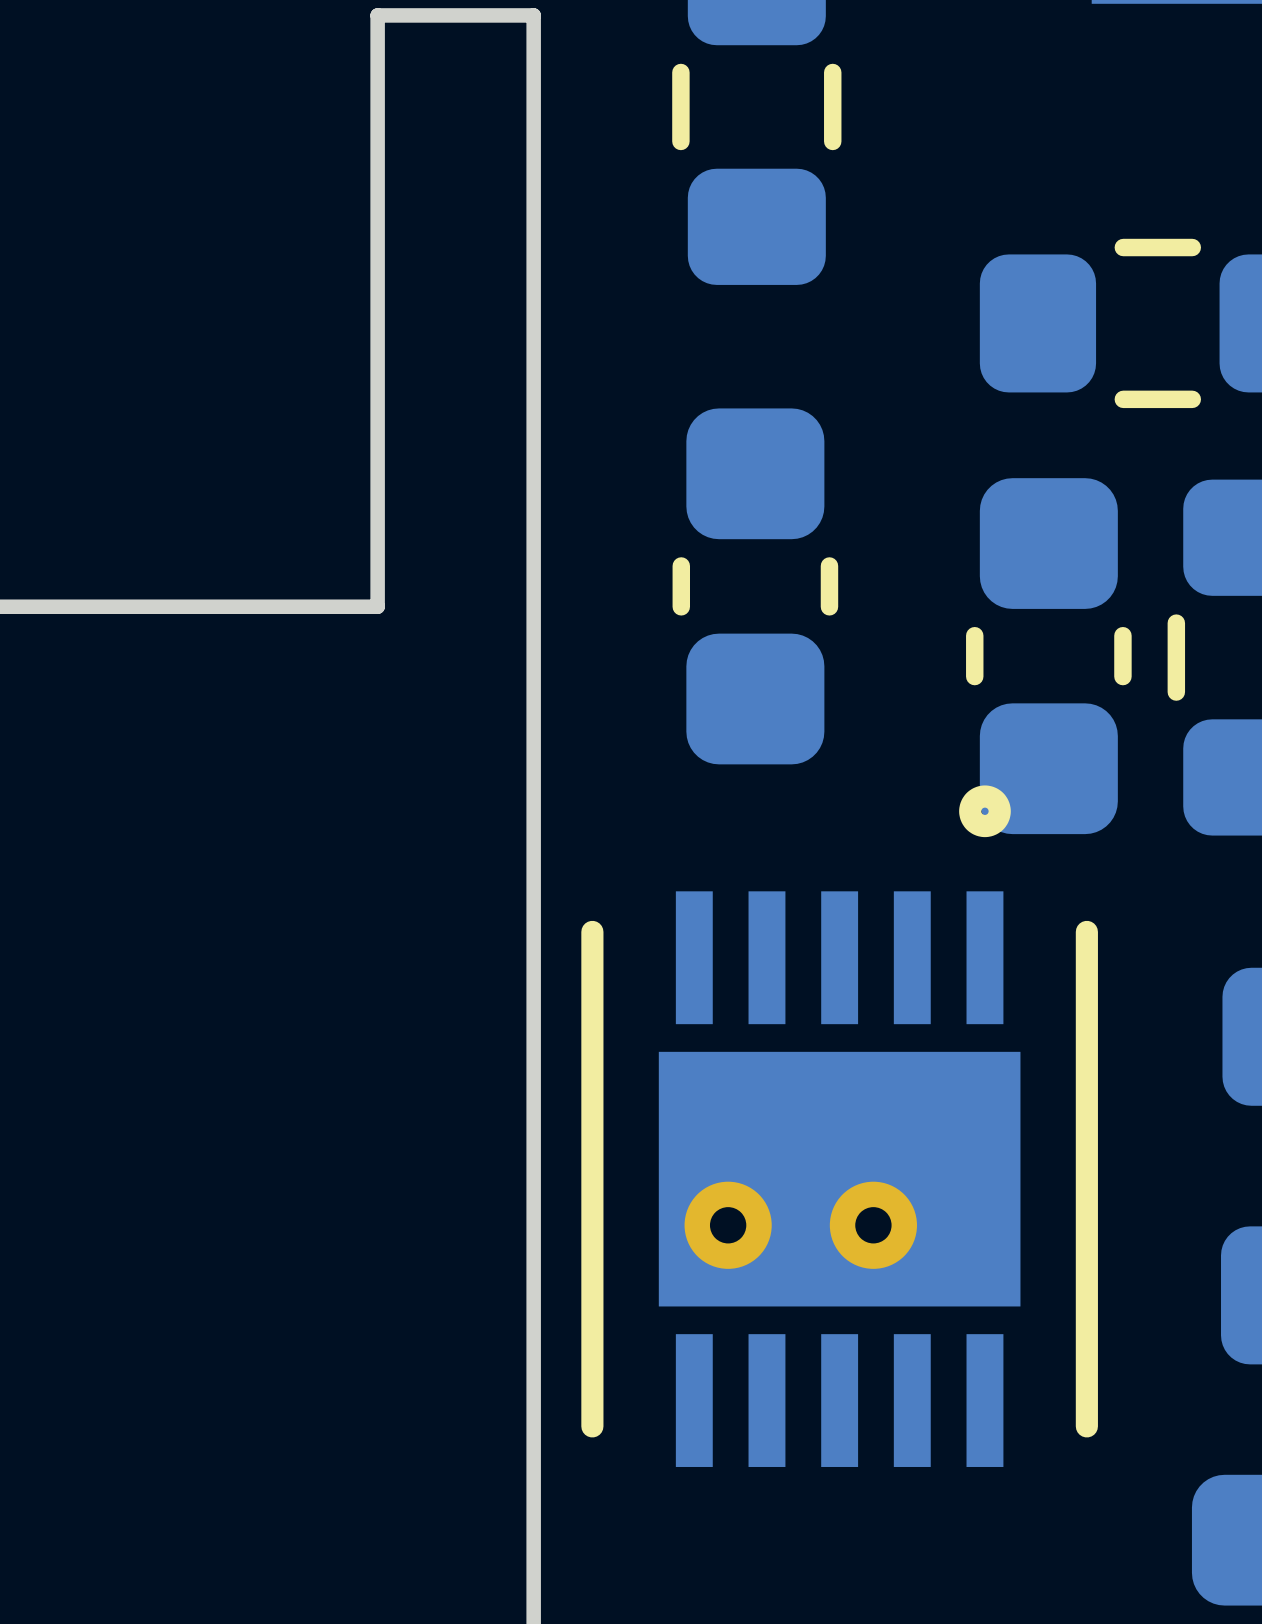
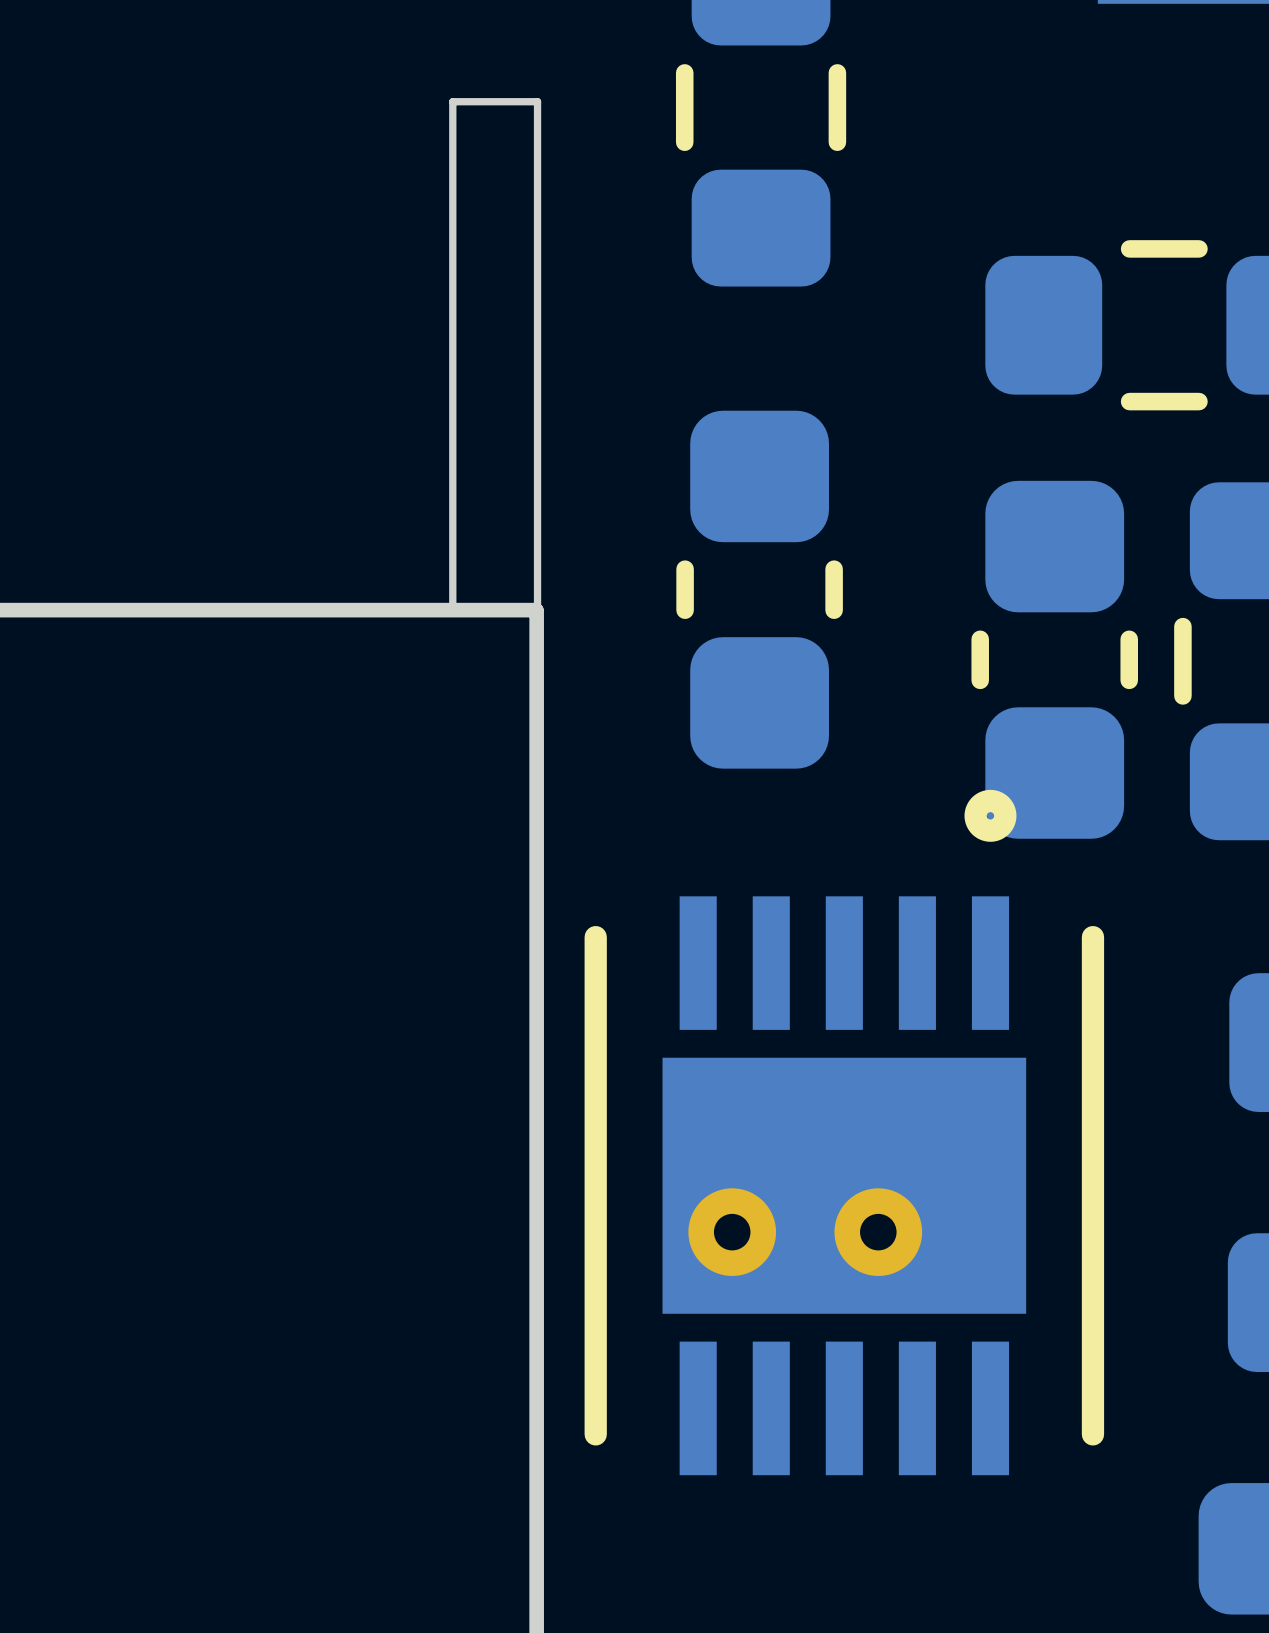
board edge: none -> (537, 101) (452, 101) (452, 610) (537, 610) (537, 101)
board edge: (533, 607) (533, 15) (377, 15) (377, 606) -> (536, 610) (379, 610)

